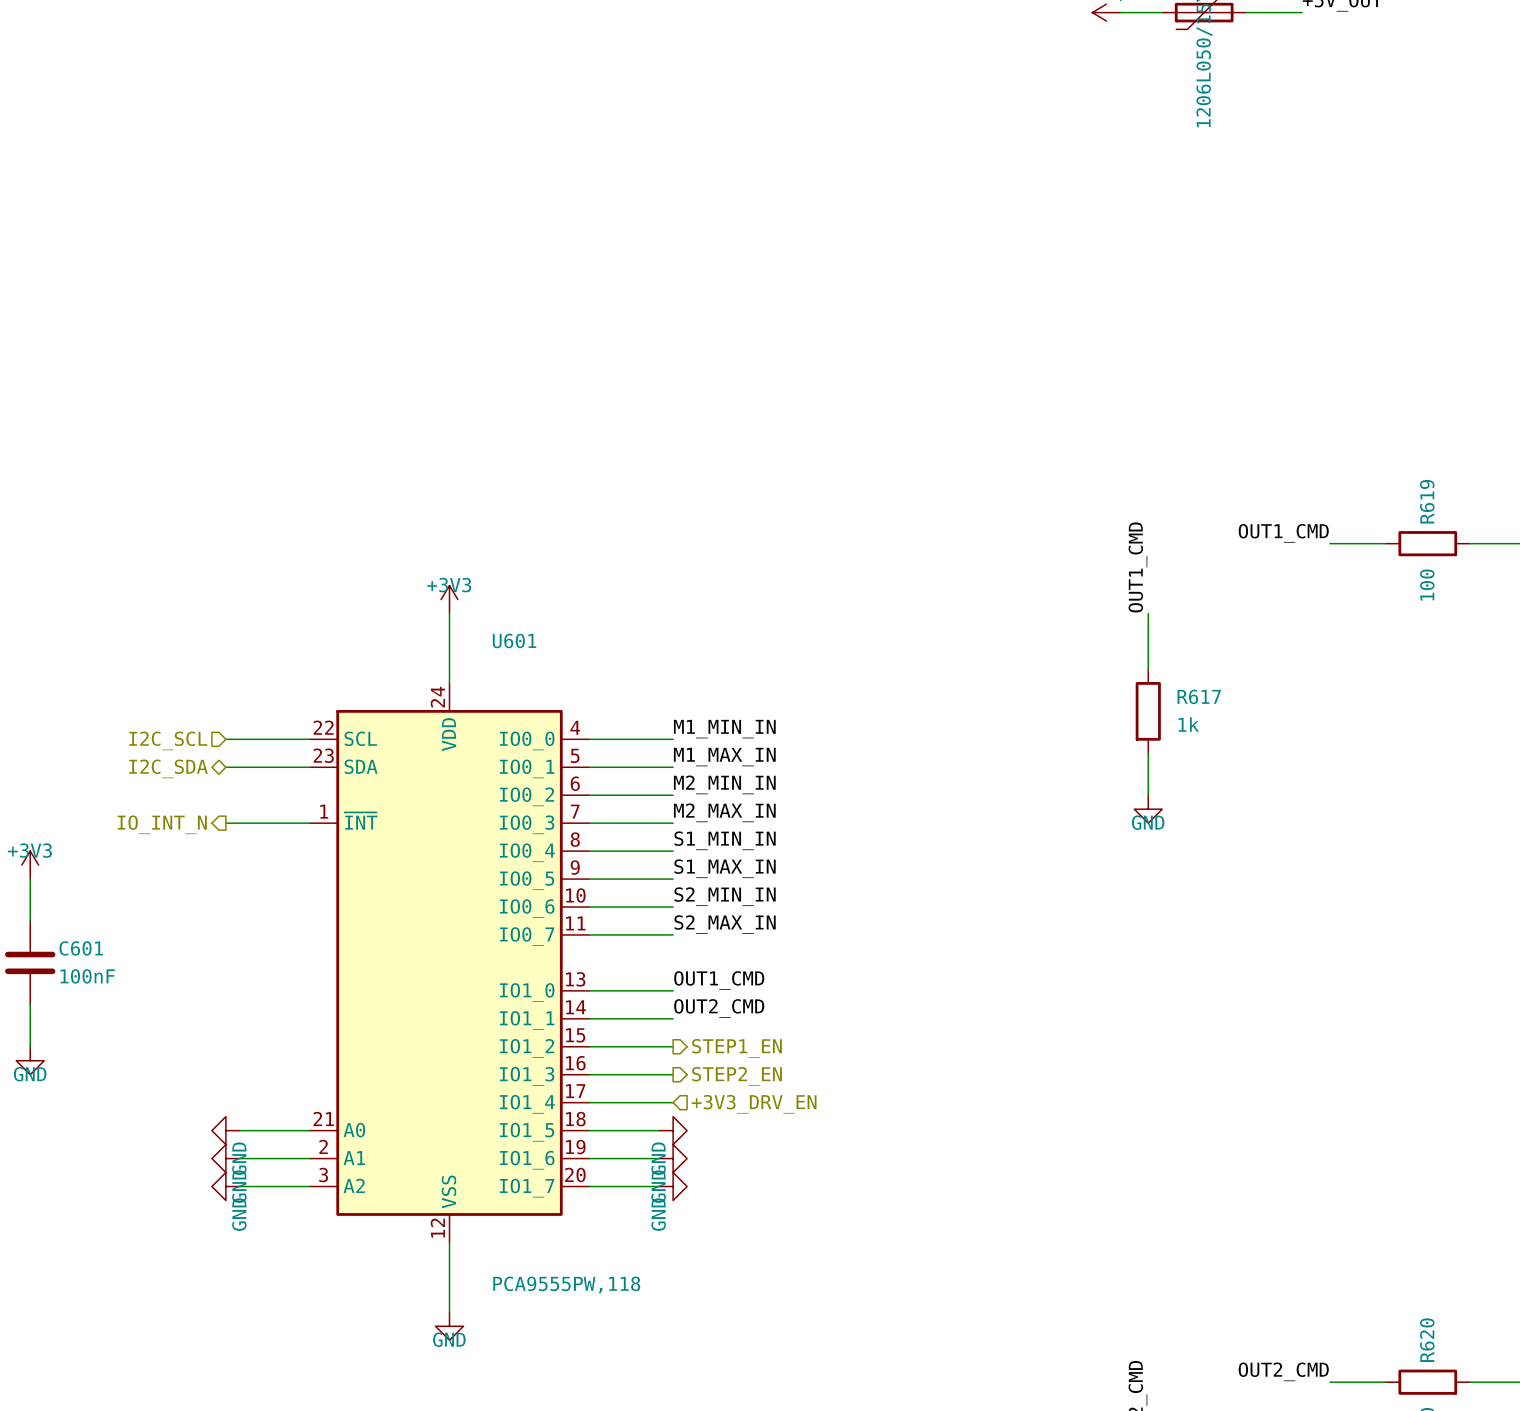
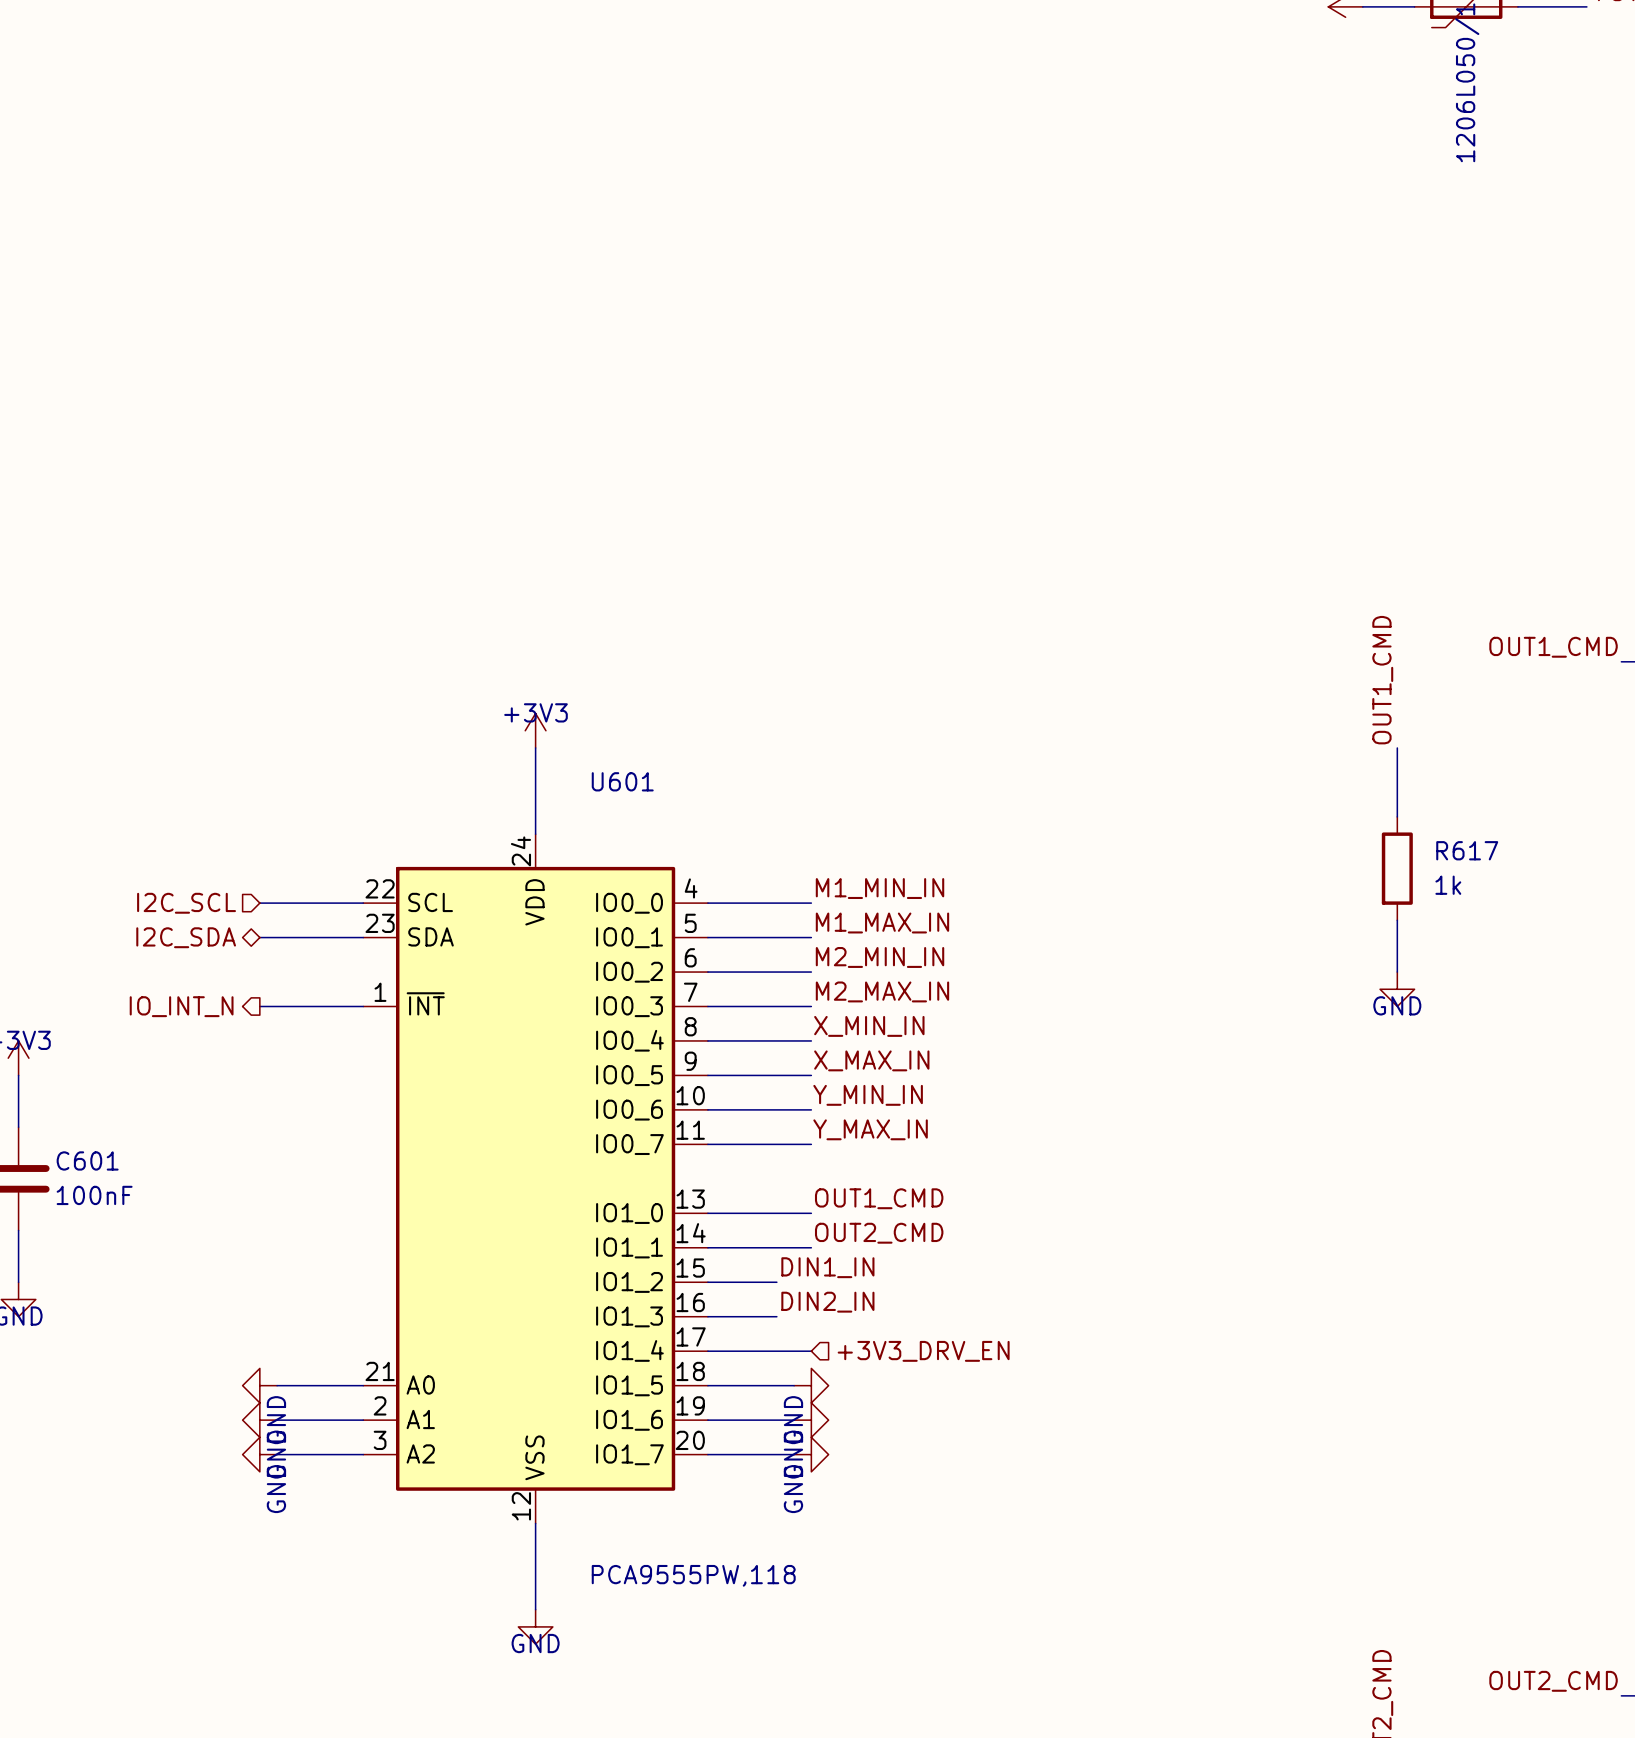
label: S1_MIN_IN (725, 840) -> X_MIN_IN (869, 1026)
label: S1_MAX_IN (725, 868) -> X_MAX_IN (871, 1060)
label: S2_MIN_IN (725, 896) -> Y_MIN_IN (868, 1095)
label: S2_MAX_IN (725, 924) -> Y_MAX_IN (870, 1129)
label: none -> DIN1_IN (827, 1267)
wire: (645, 1046) (673, 1046) -> none
hierarchical label: STEP1_EN (737, 1048) -> none
label: none -> DIN2_IN (827, 1302)
wire: (645, 1074) (673, 1074) -> none
hierarchical label: STEP2_EN (737, 1076) -> none

